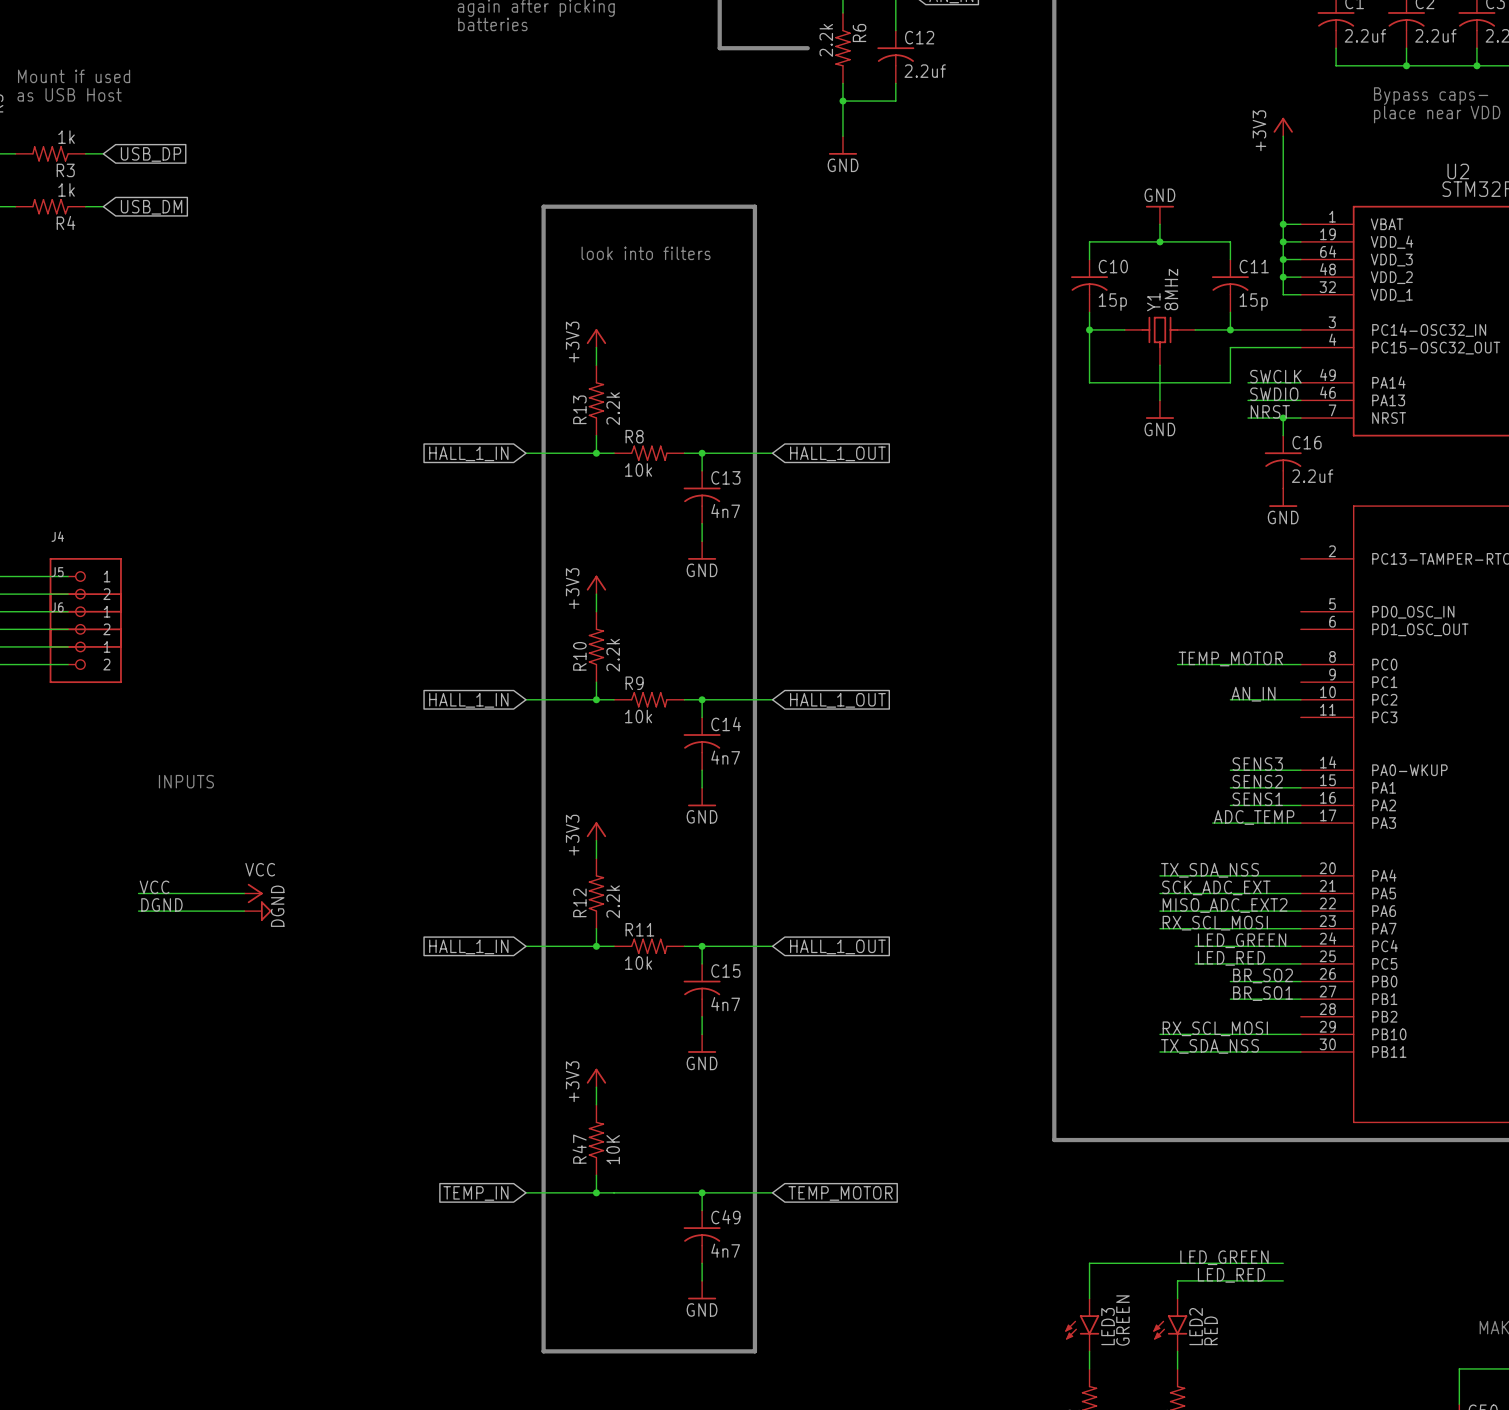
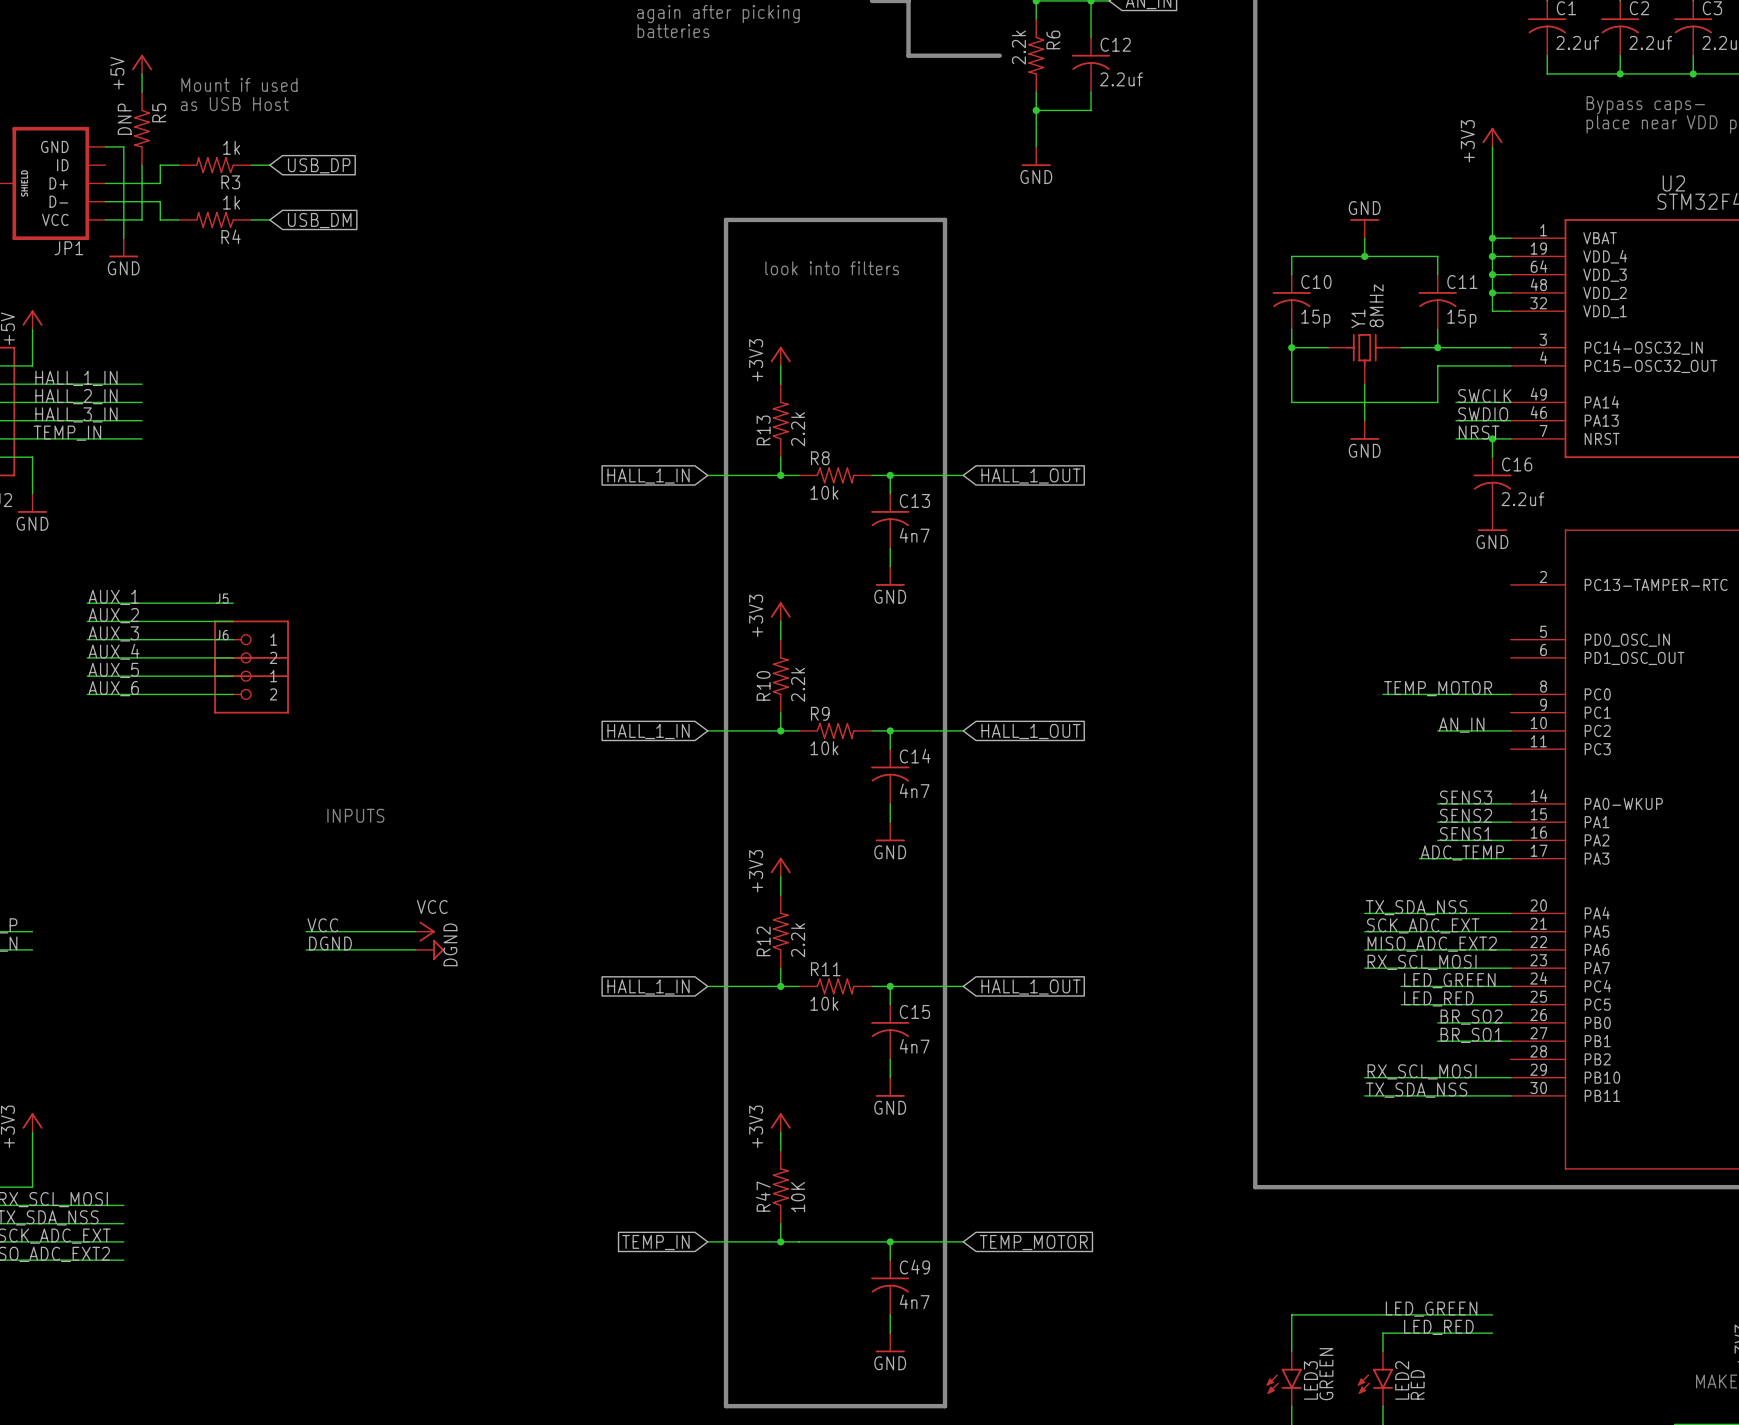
J4: (85, 585) -> none

